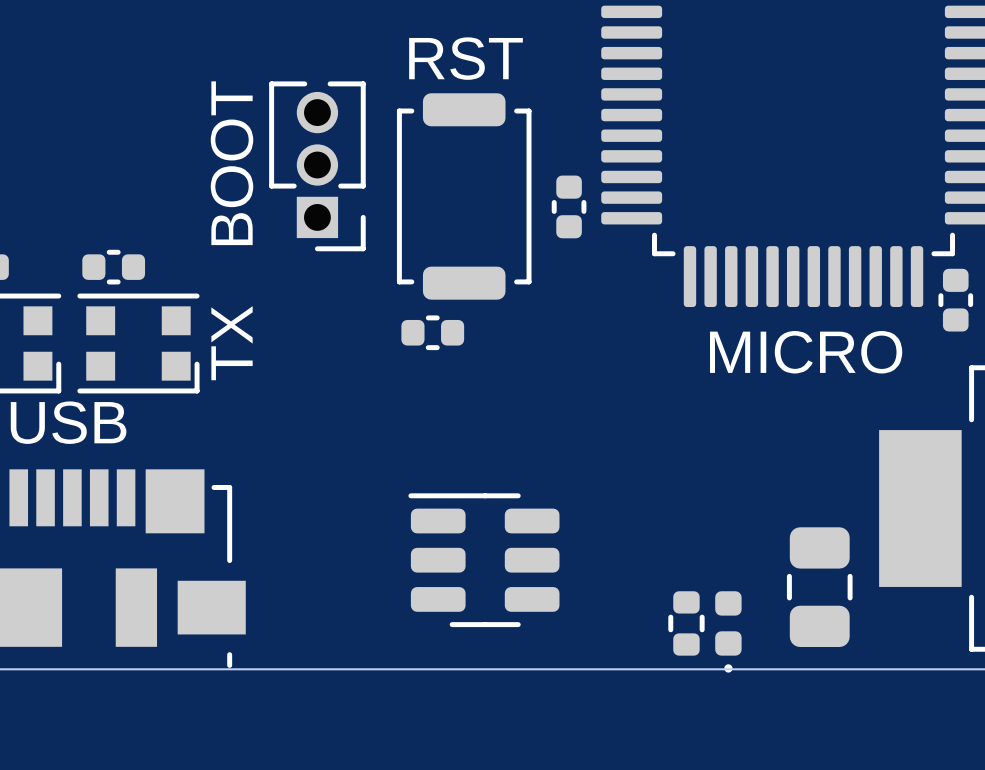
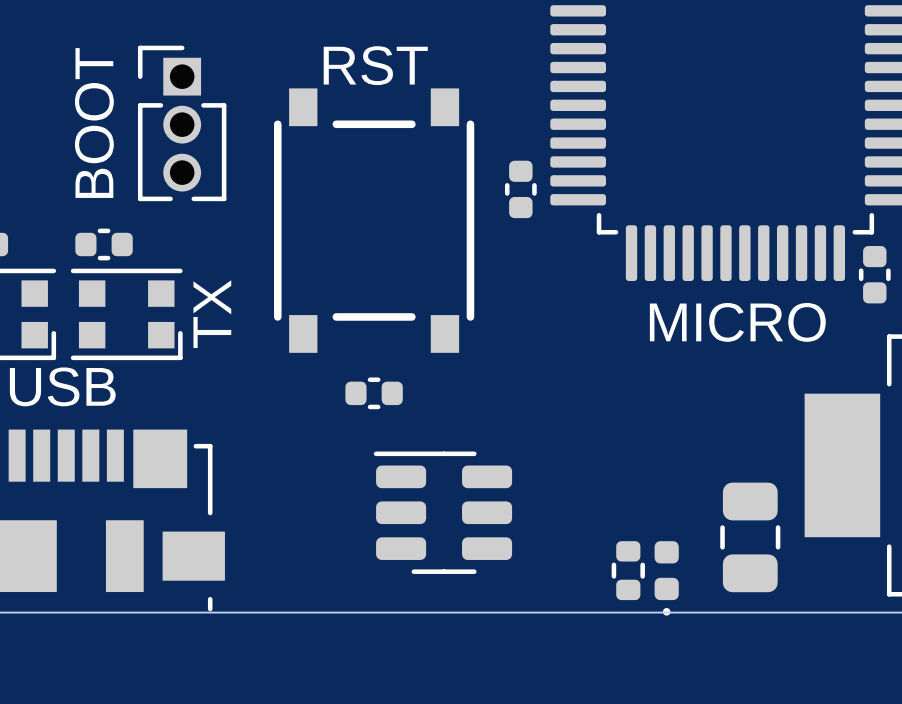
text position: RST (465, 58) -> RST (375, 65)
text position: BOOT (232, 163) -> BOOT (94, 123)
part rotation: 0° (317, 166) -> 180° (182, 123)
part position: (317, 166) -> (182, 123)
part: (464, 196) -> none
part: none -> (374, 220)
part position: (432, 332) -> (374, 393)

